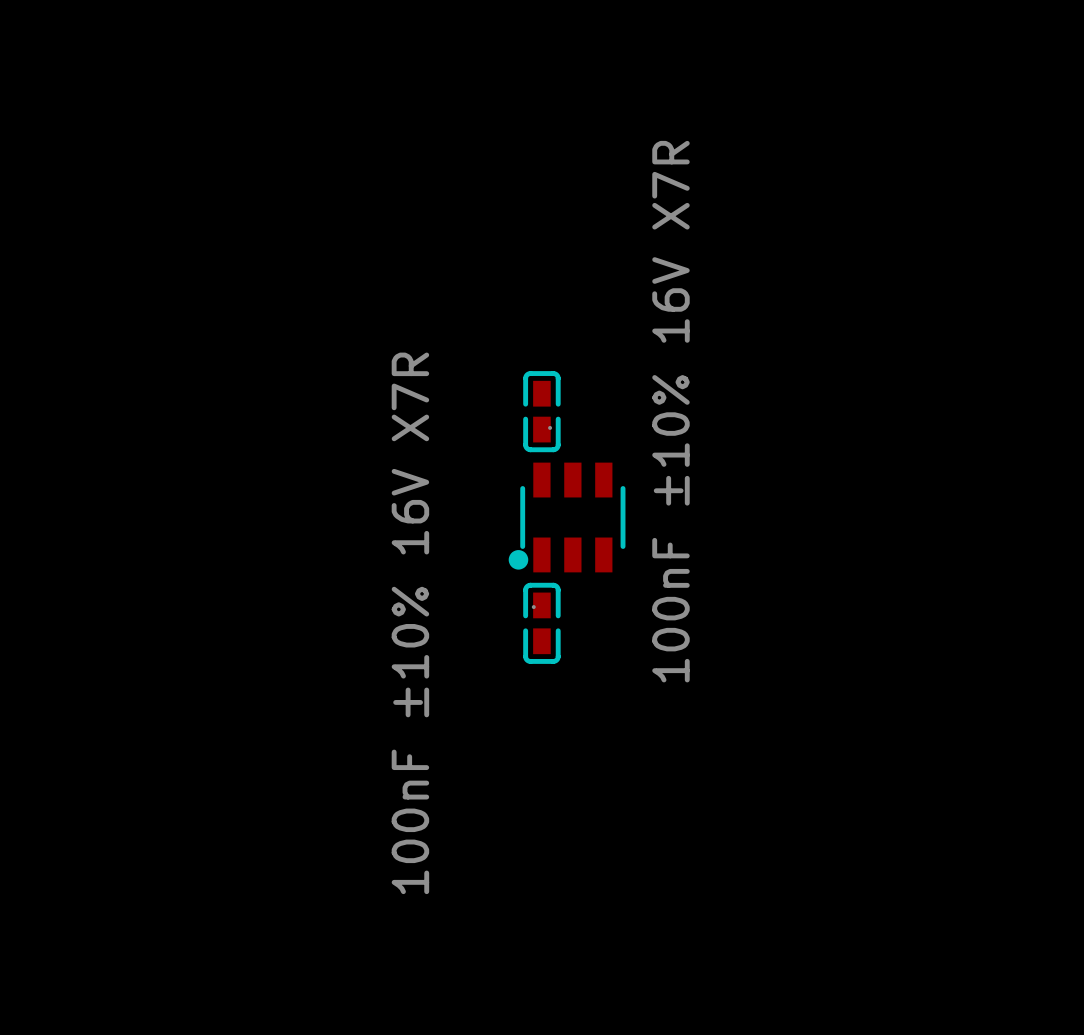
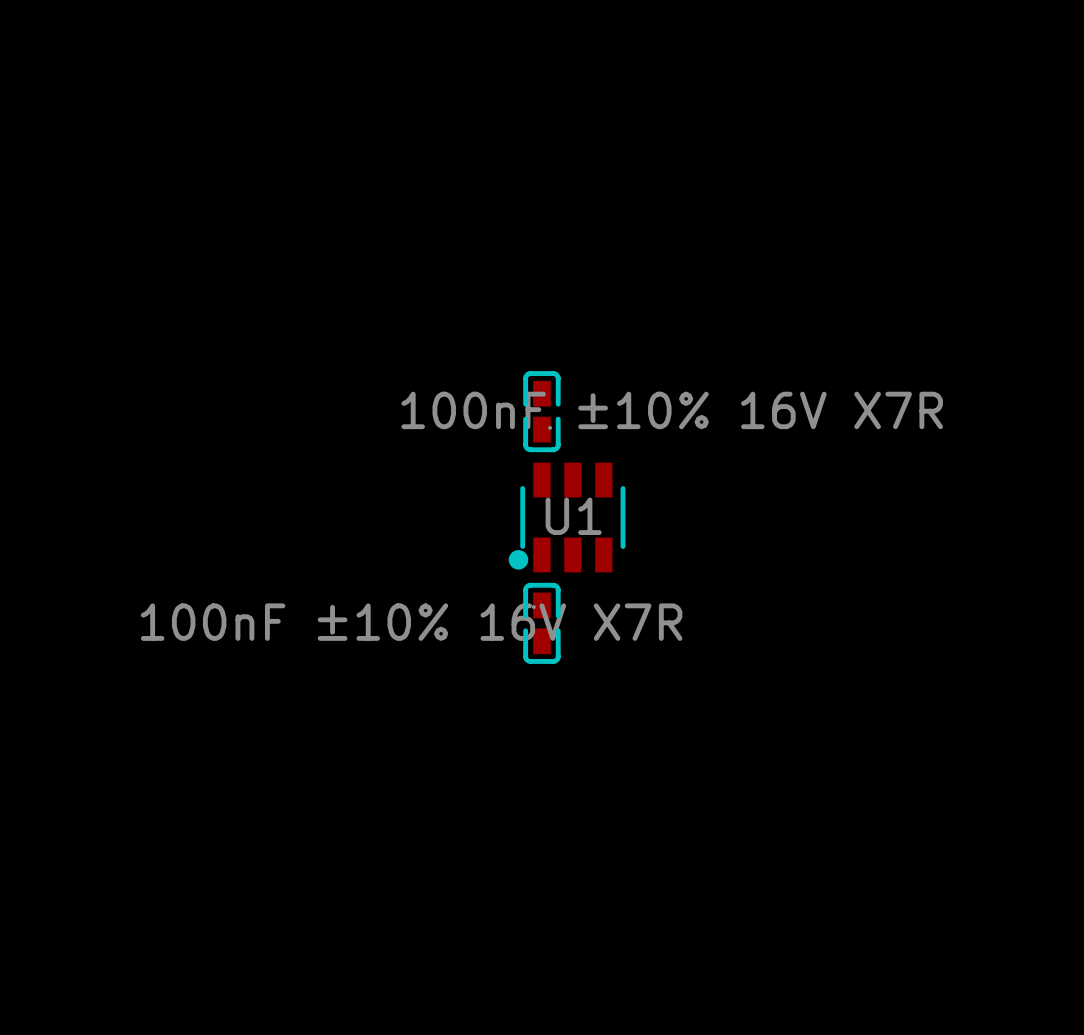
part value rotation: 0° (670, 411) -> 90° clockwise (672, 410)
U1 name: none -> U1 (573, 516)
part value rotation: 0° (410, 623) -> 90° clockwise (411, 622)

